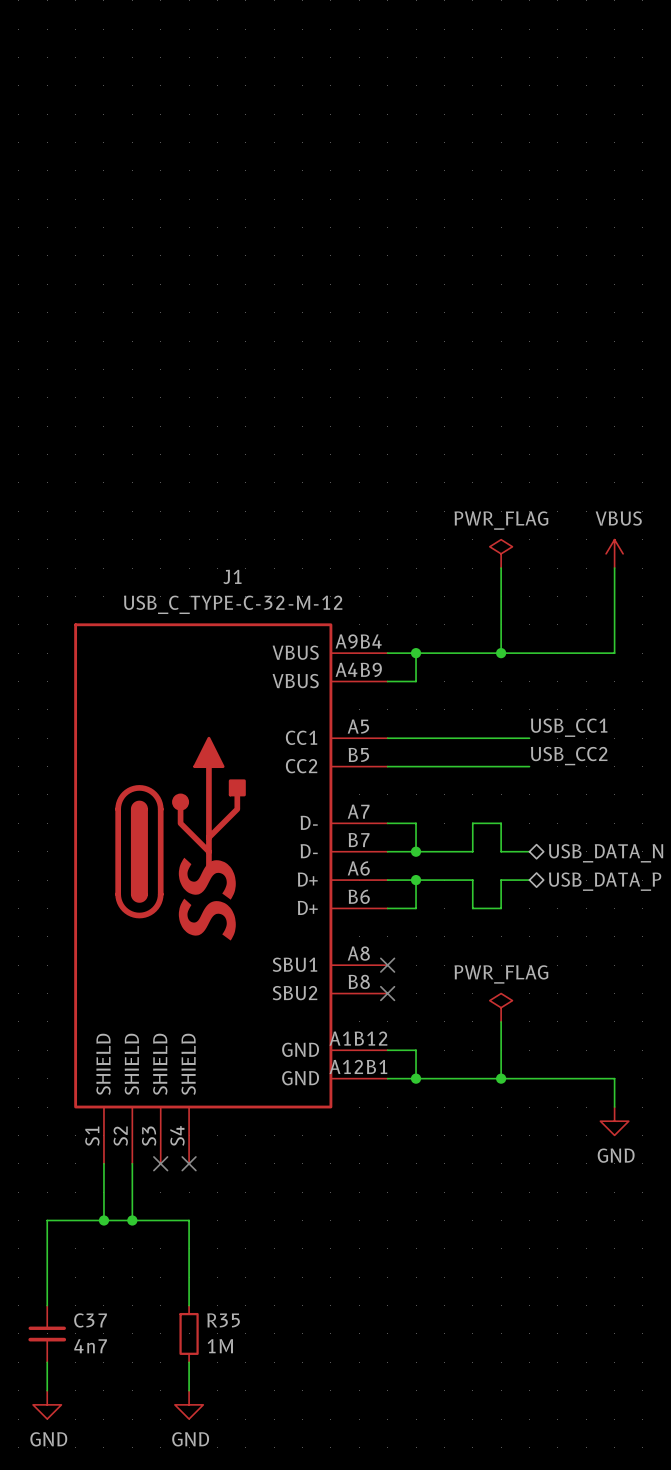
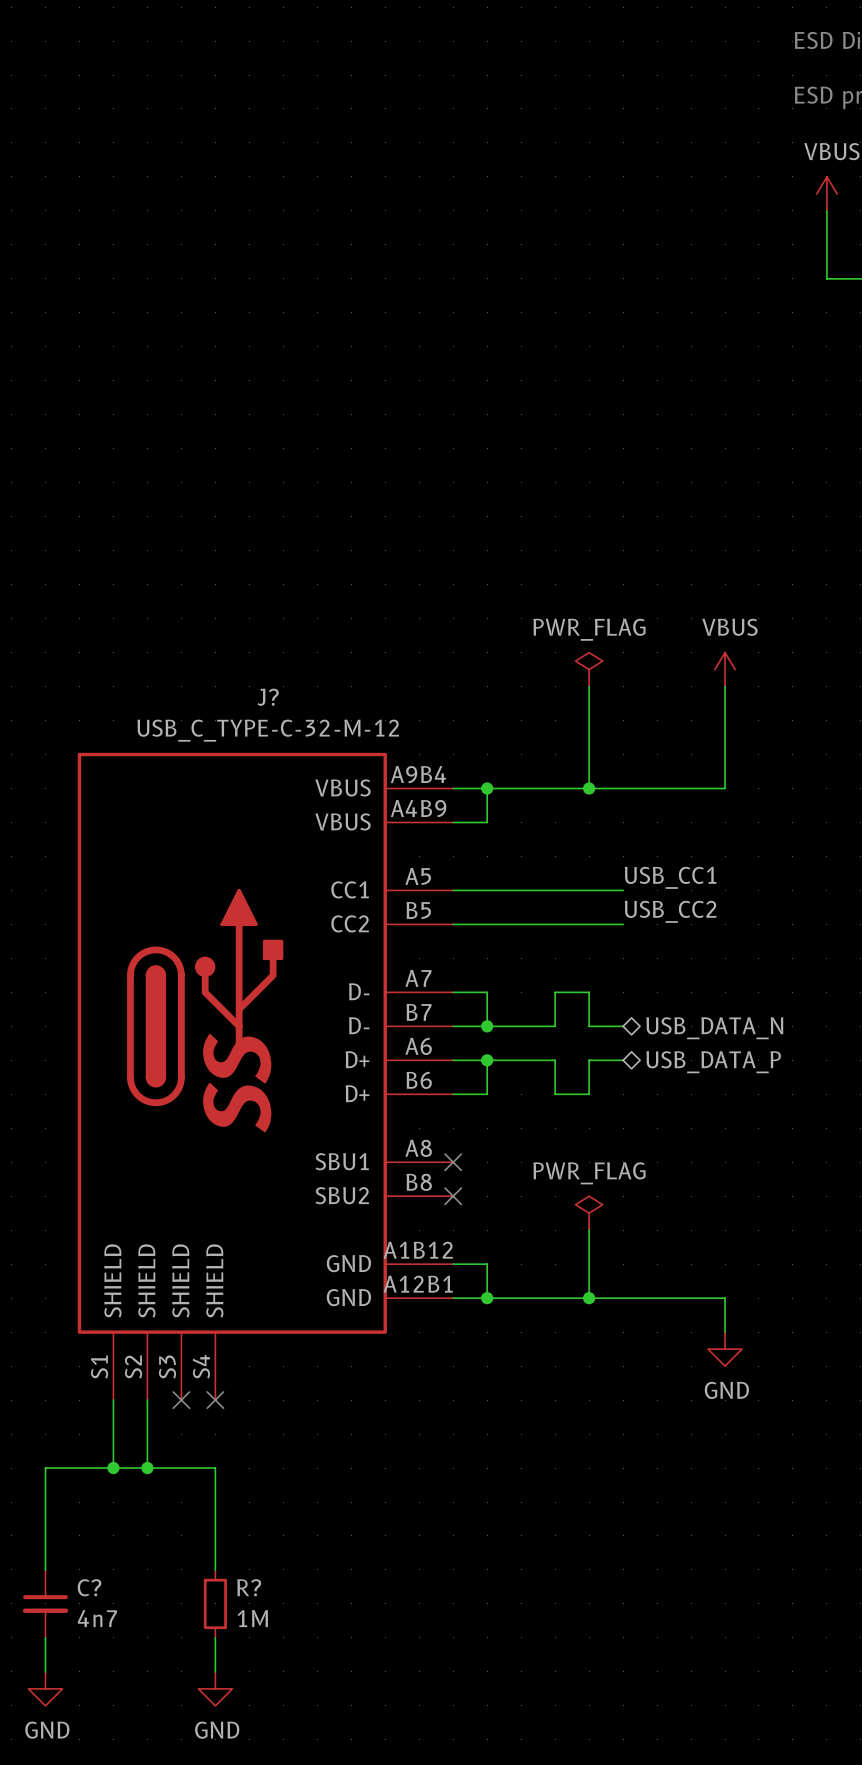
J1 name: J1 (232, 576) -> J? (268, 697)
C37 name: C37 (90, 1320) -> C? (89, 1587)
R35 name: R35 (223, 1320) -> R? (249, 1587)

